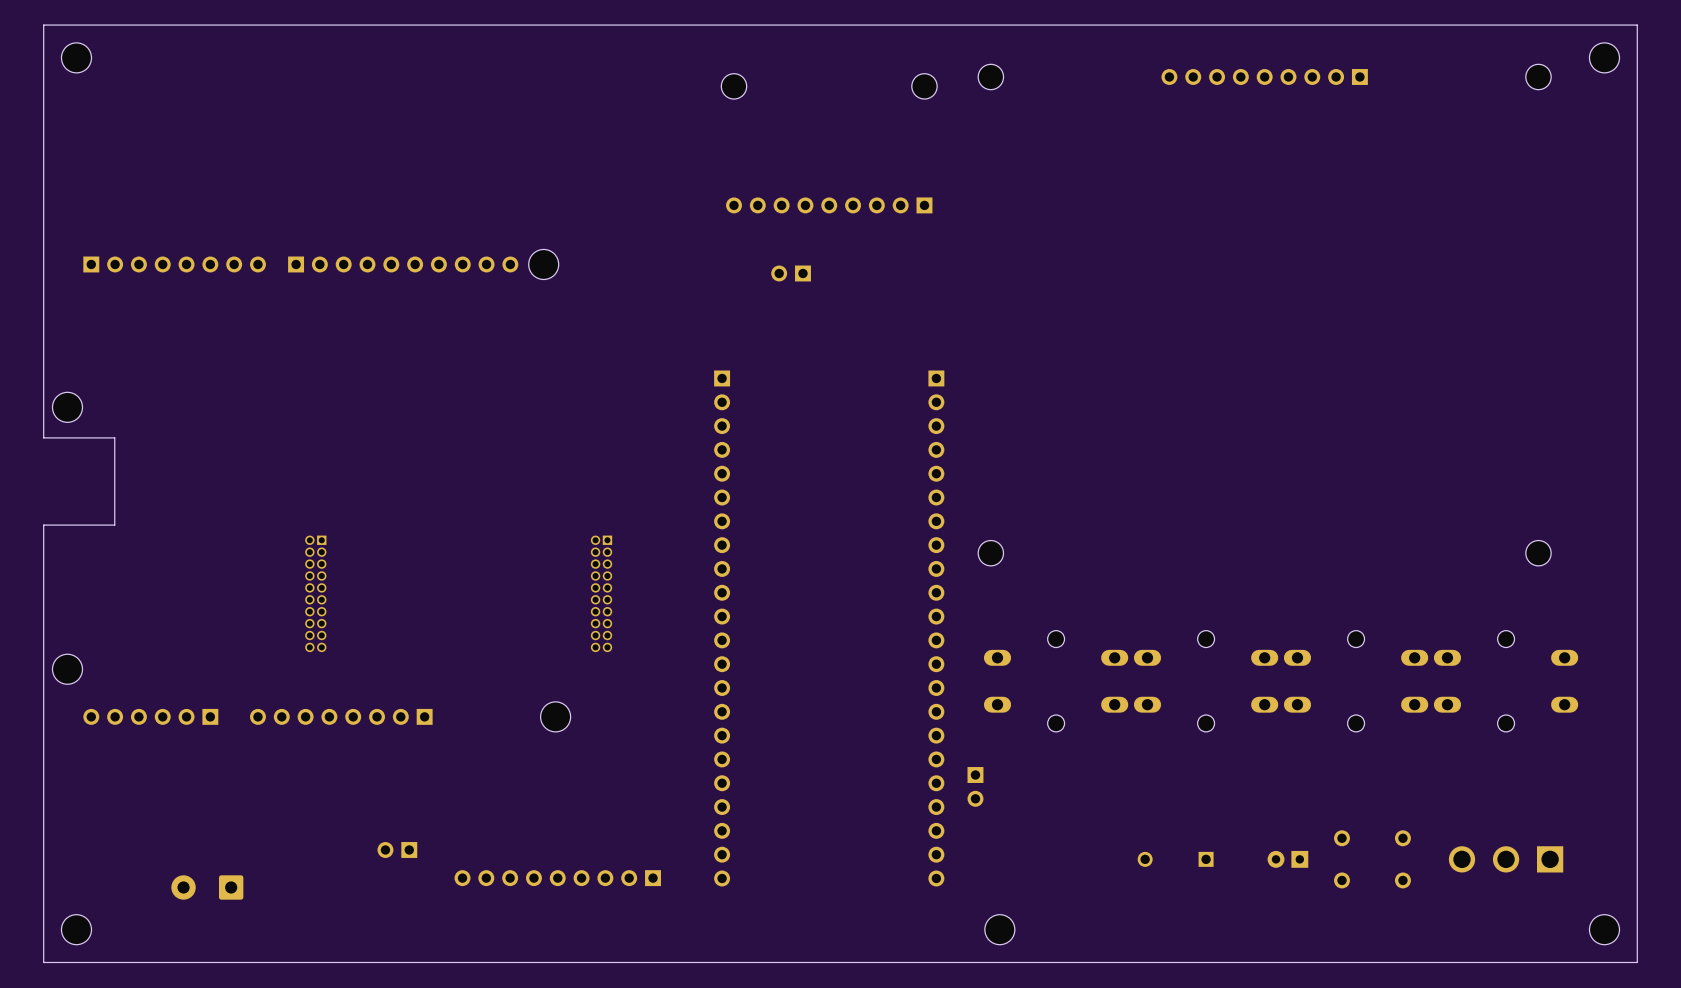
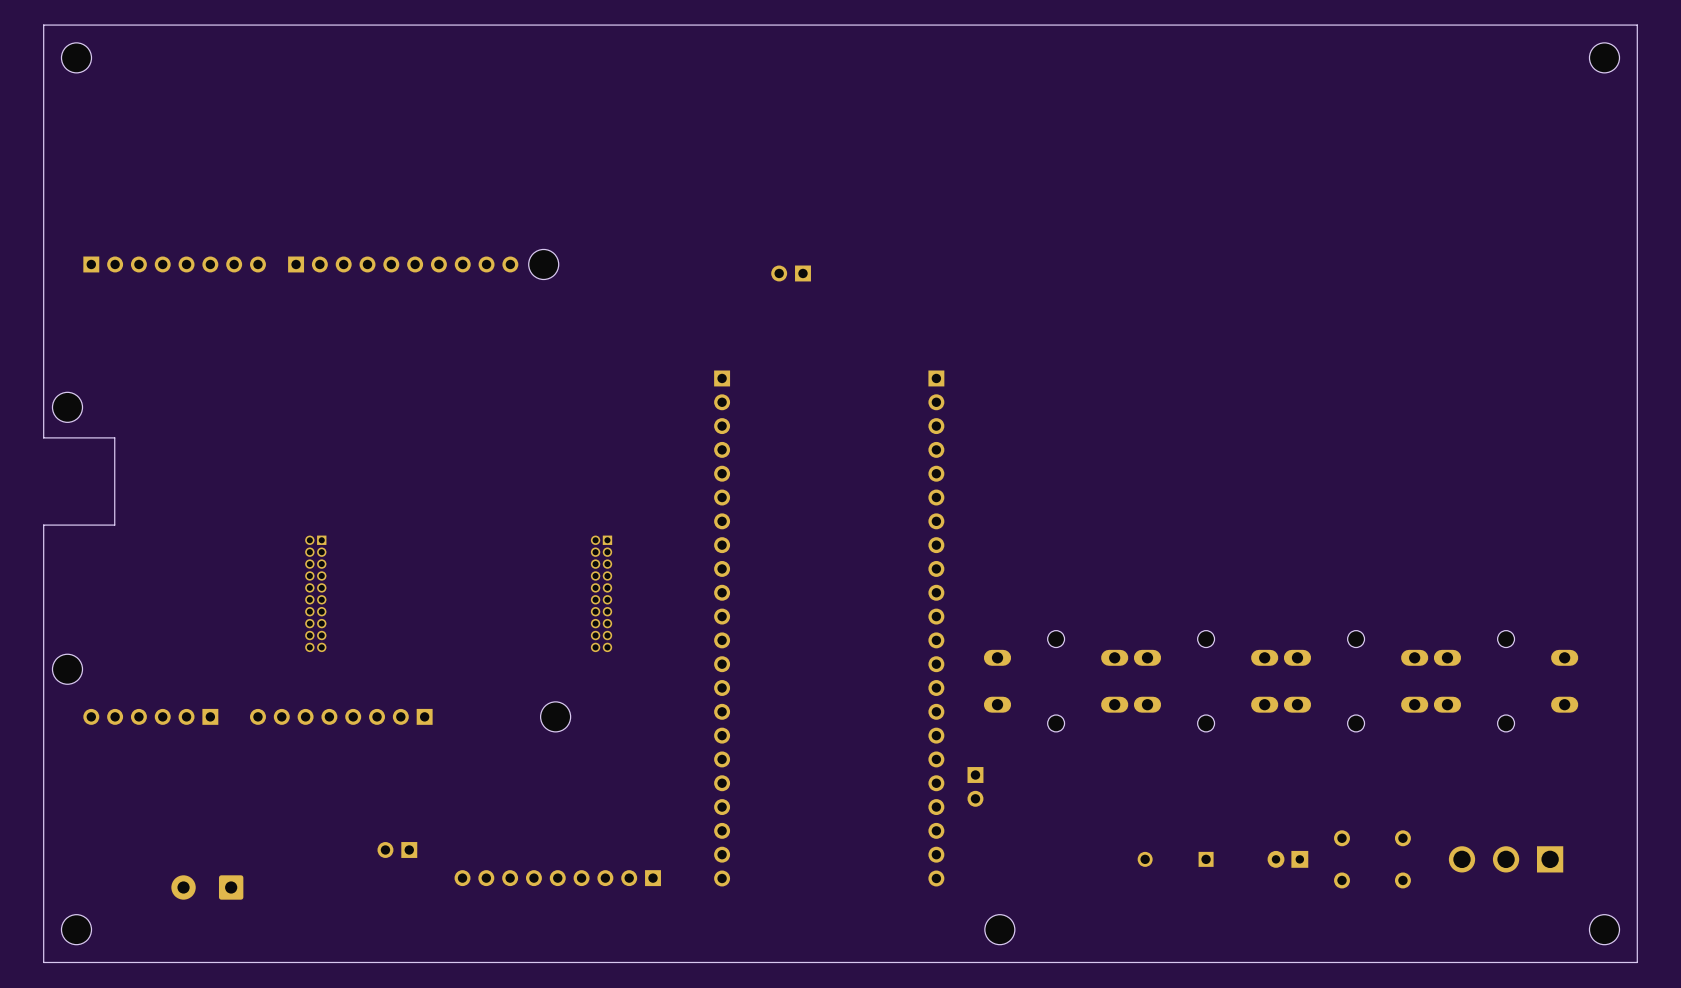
part: (990, 76) -> none
part: (1264, 76) -> none
part: (1538, 76) -> none
part: (734, 86) -> none
part: (924, 86) -> none
part: (829, 205) -> none
part: (990, 553) -> none
part: (1538, 553) -> none

